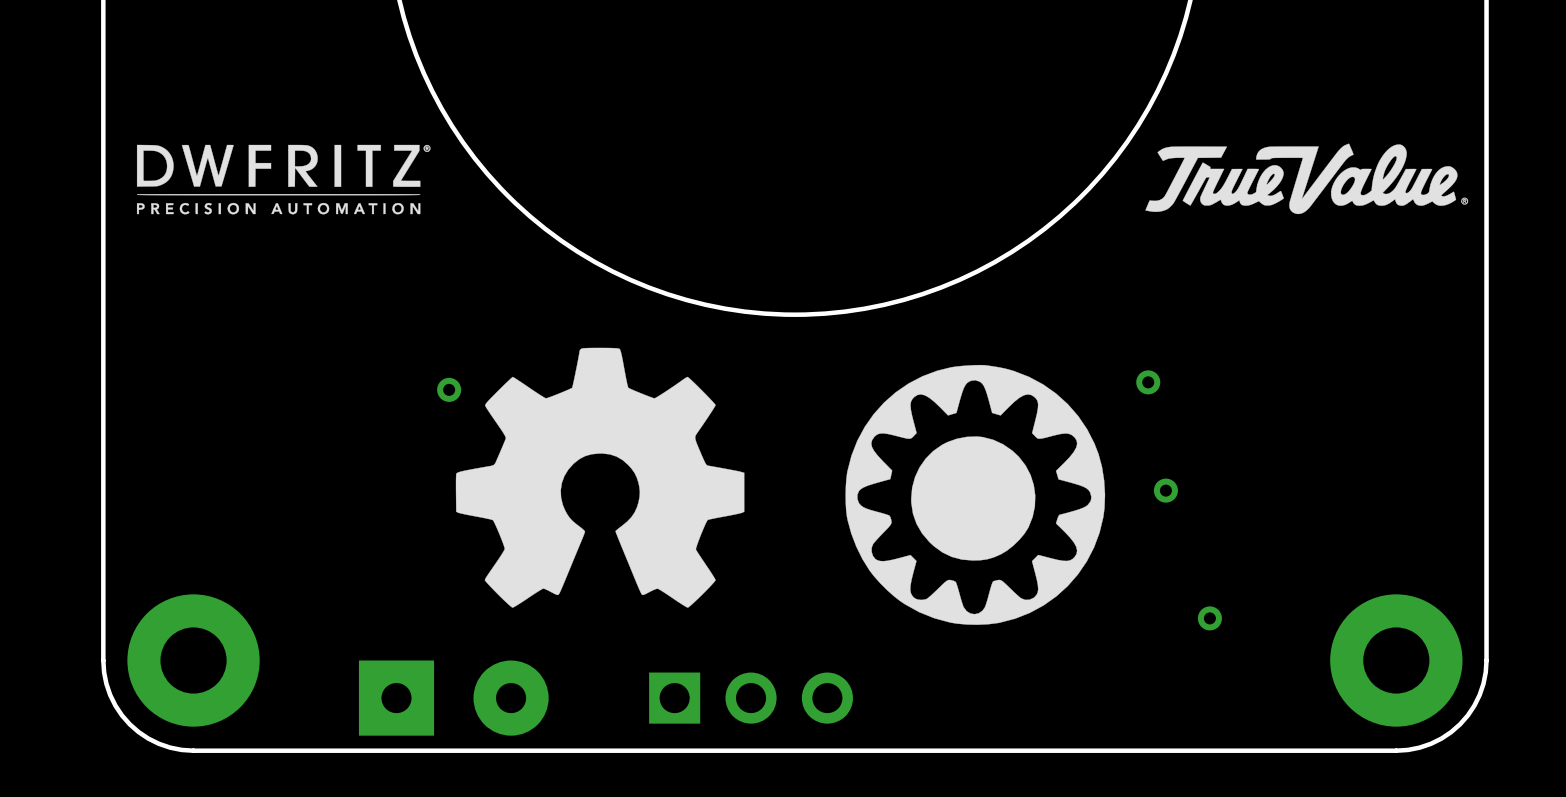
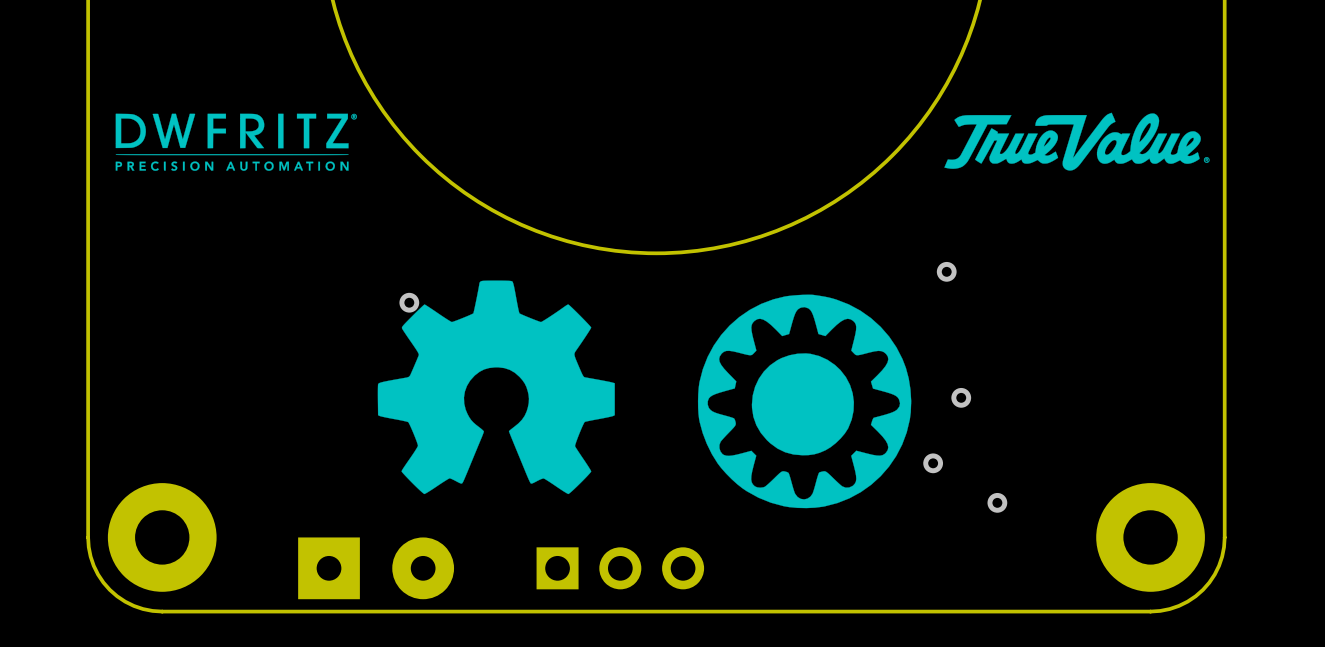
via position: (1148, 382) -> (946, 271)
via position: (449, 389) -> (409, 302)
via: none -> (933, 463)

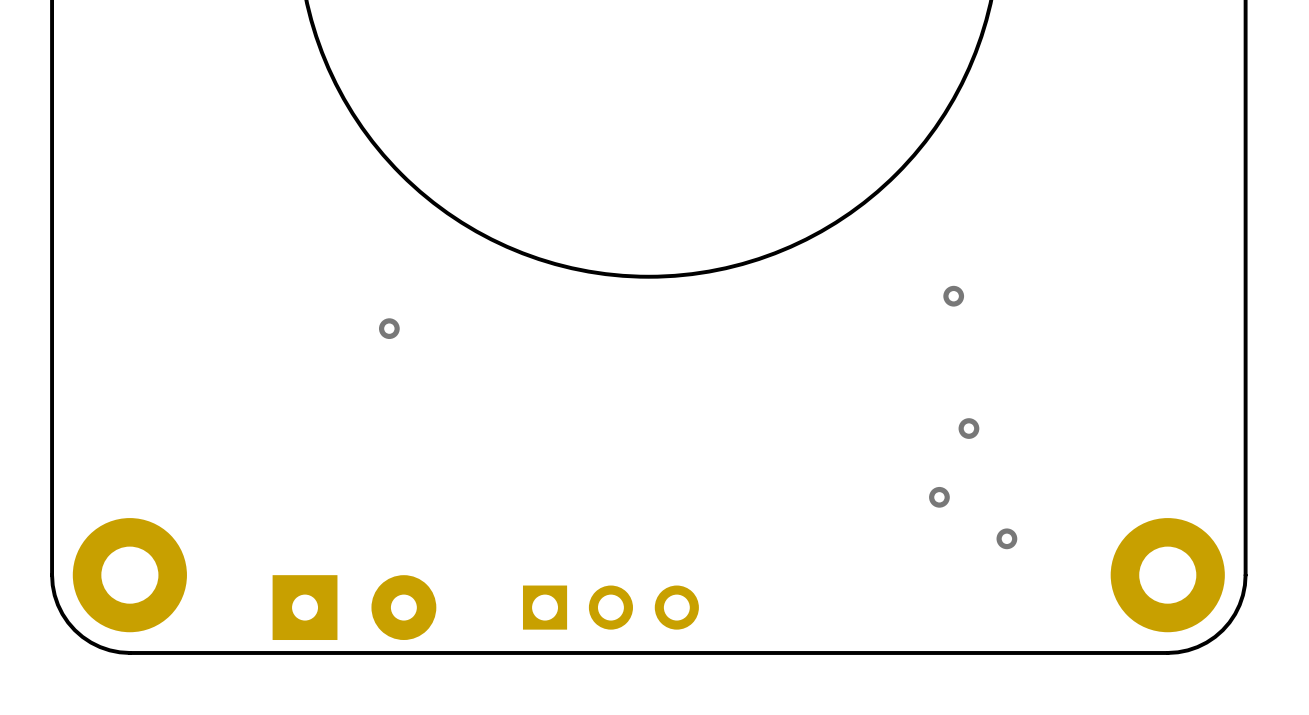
drawing: [944, 112, 1210, 171] -> none
drawing: [115, 113, 357, 171] -> none
drawing: [377, 280, 615, 495] -> none
drawing: [697, 294, 912, 509] -> none

